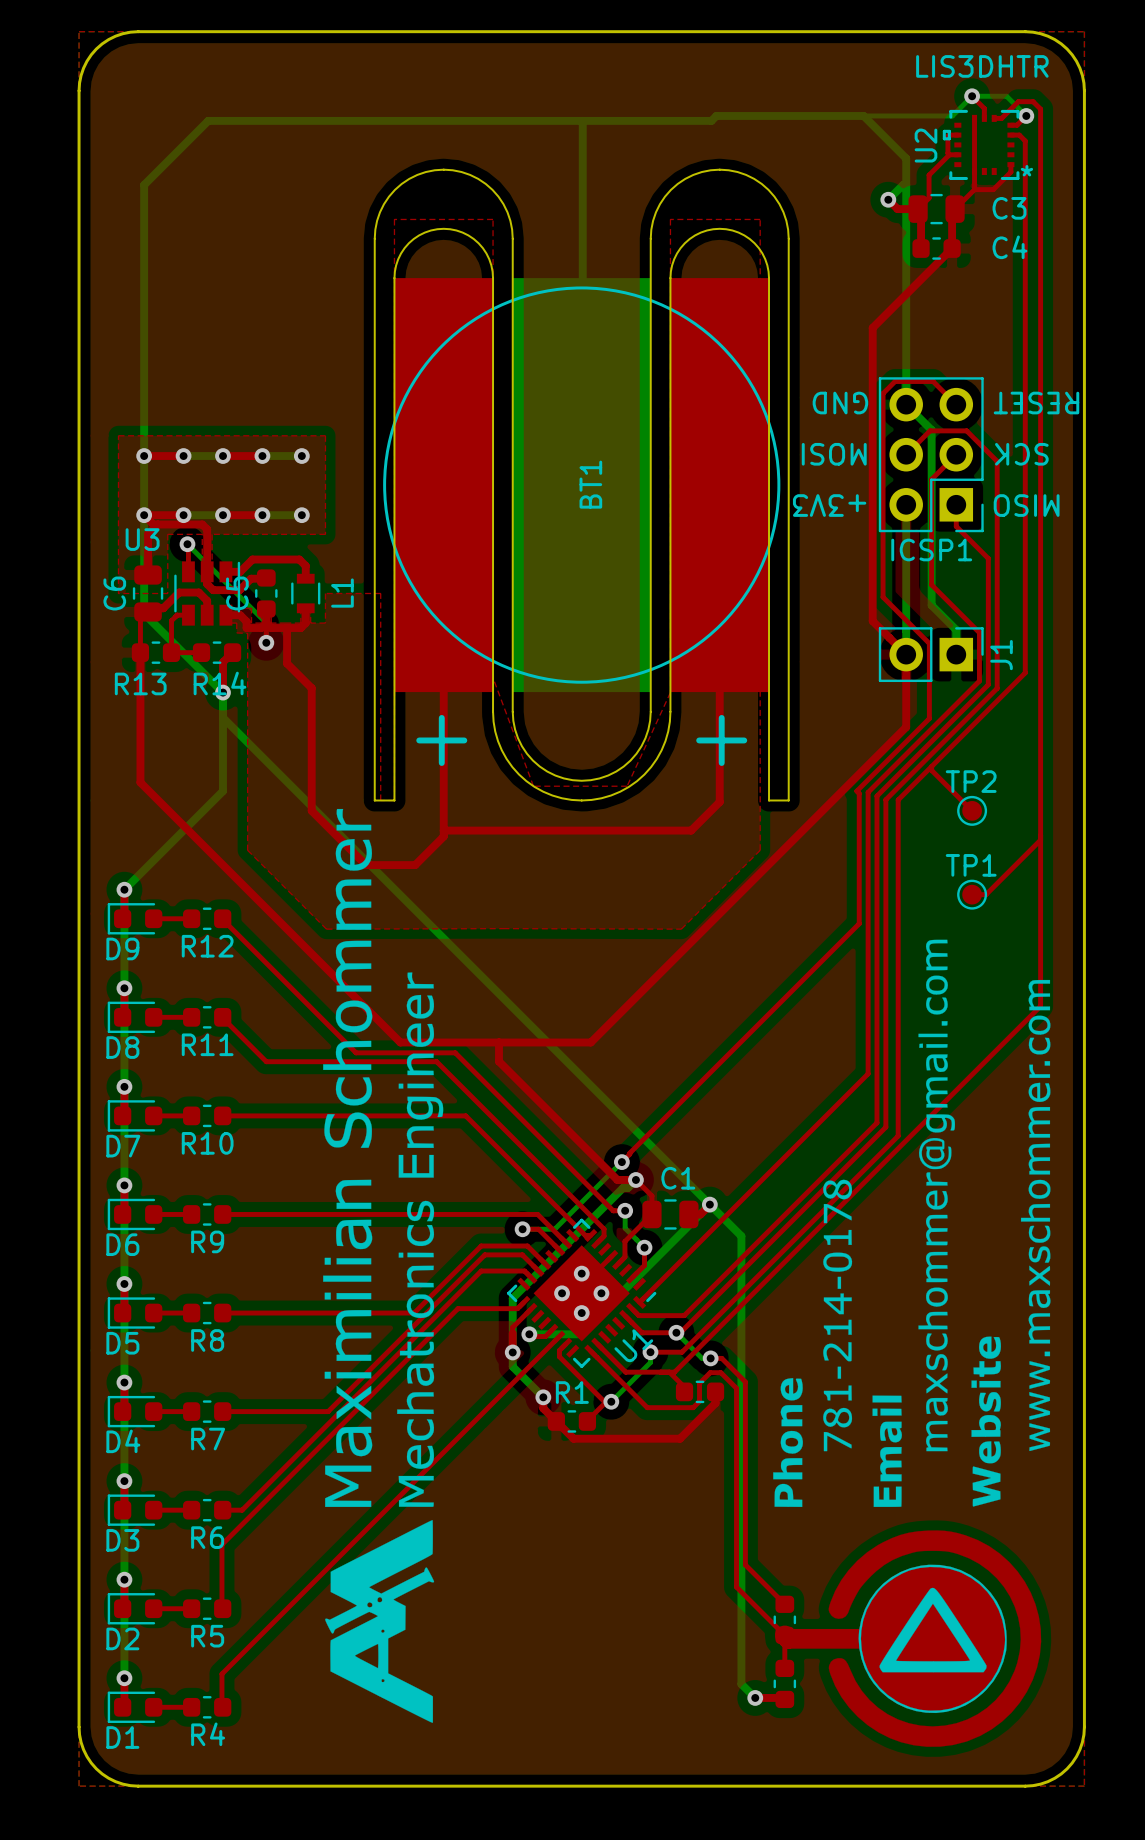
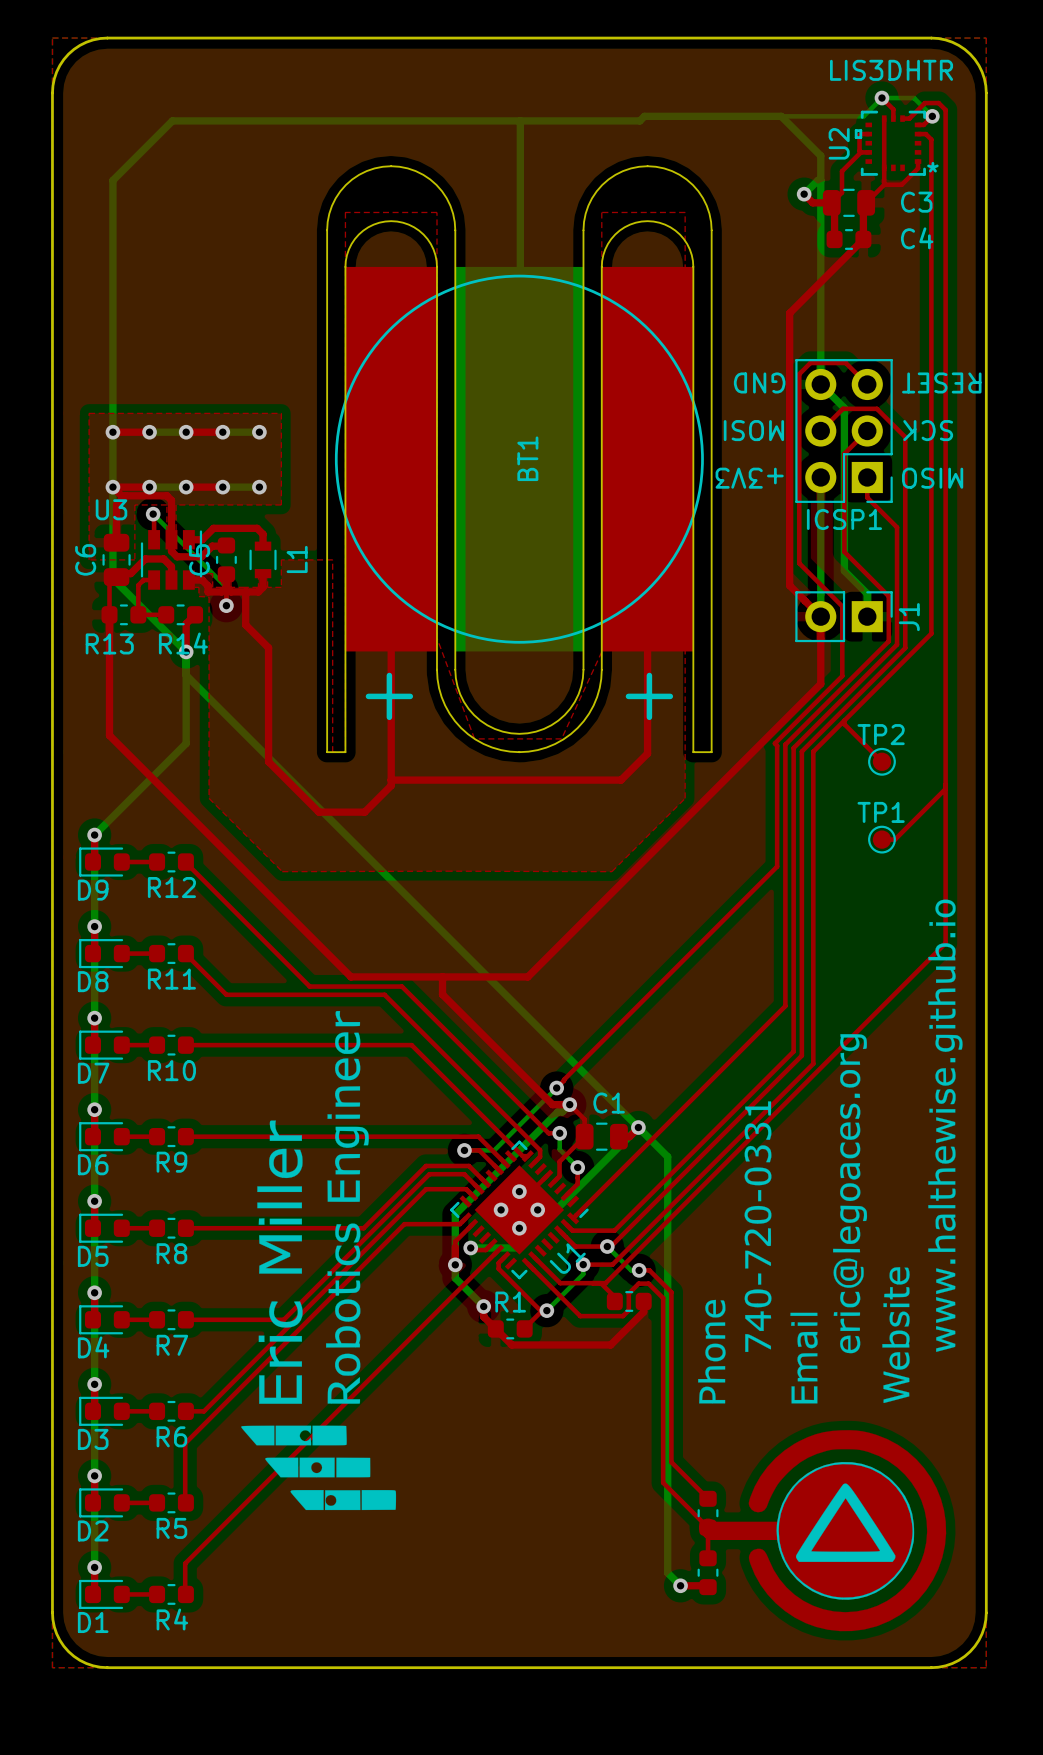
drawing: [323, 808, 1051, 1723] -> none
drawing: none -> [241, 899, 963, 1511]

